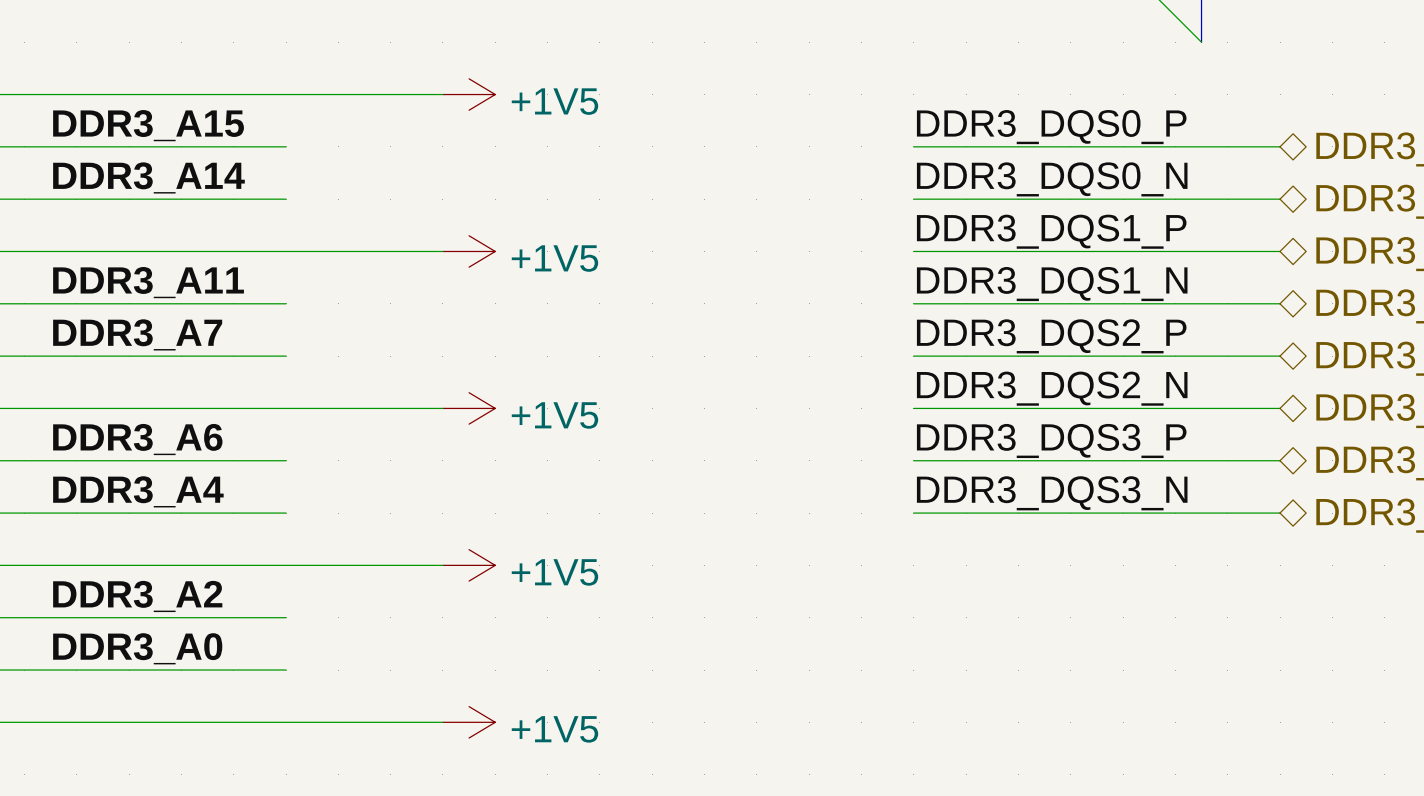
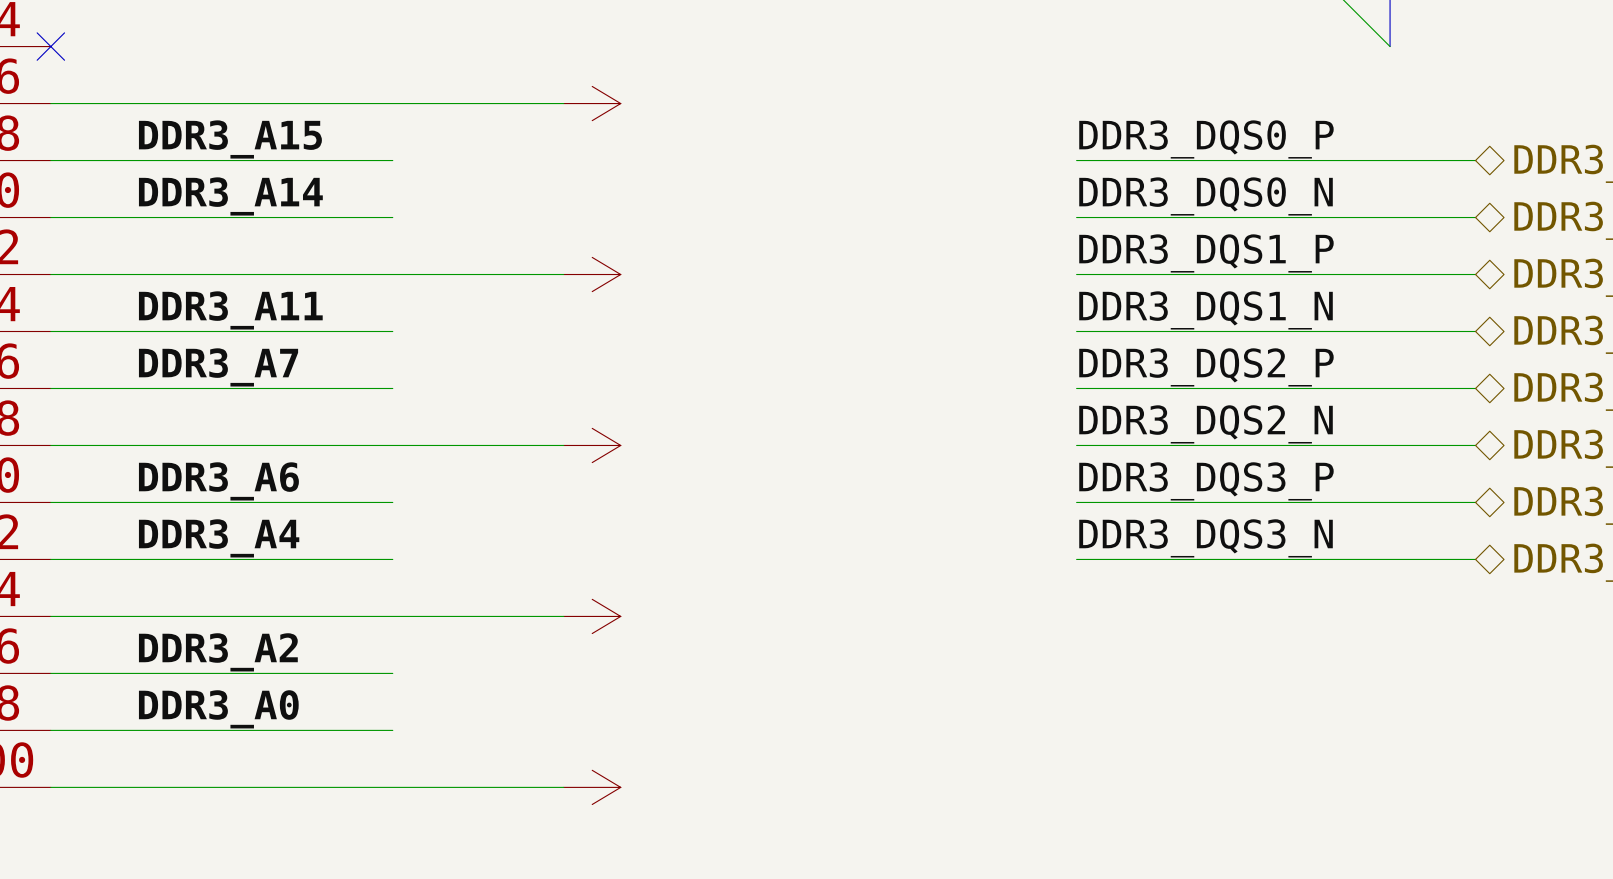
power symbol text: +1V5 (554, 101) -> none
power symbol text: +1V5 (554, 258) -> none
power symbol text: +1V5 (554, 415) -> none
power symbol text: +1V5 (554, 572) -> none
power symbol text: +1V5 (554, 729) -> none

